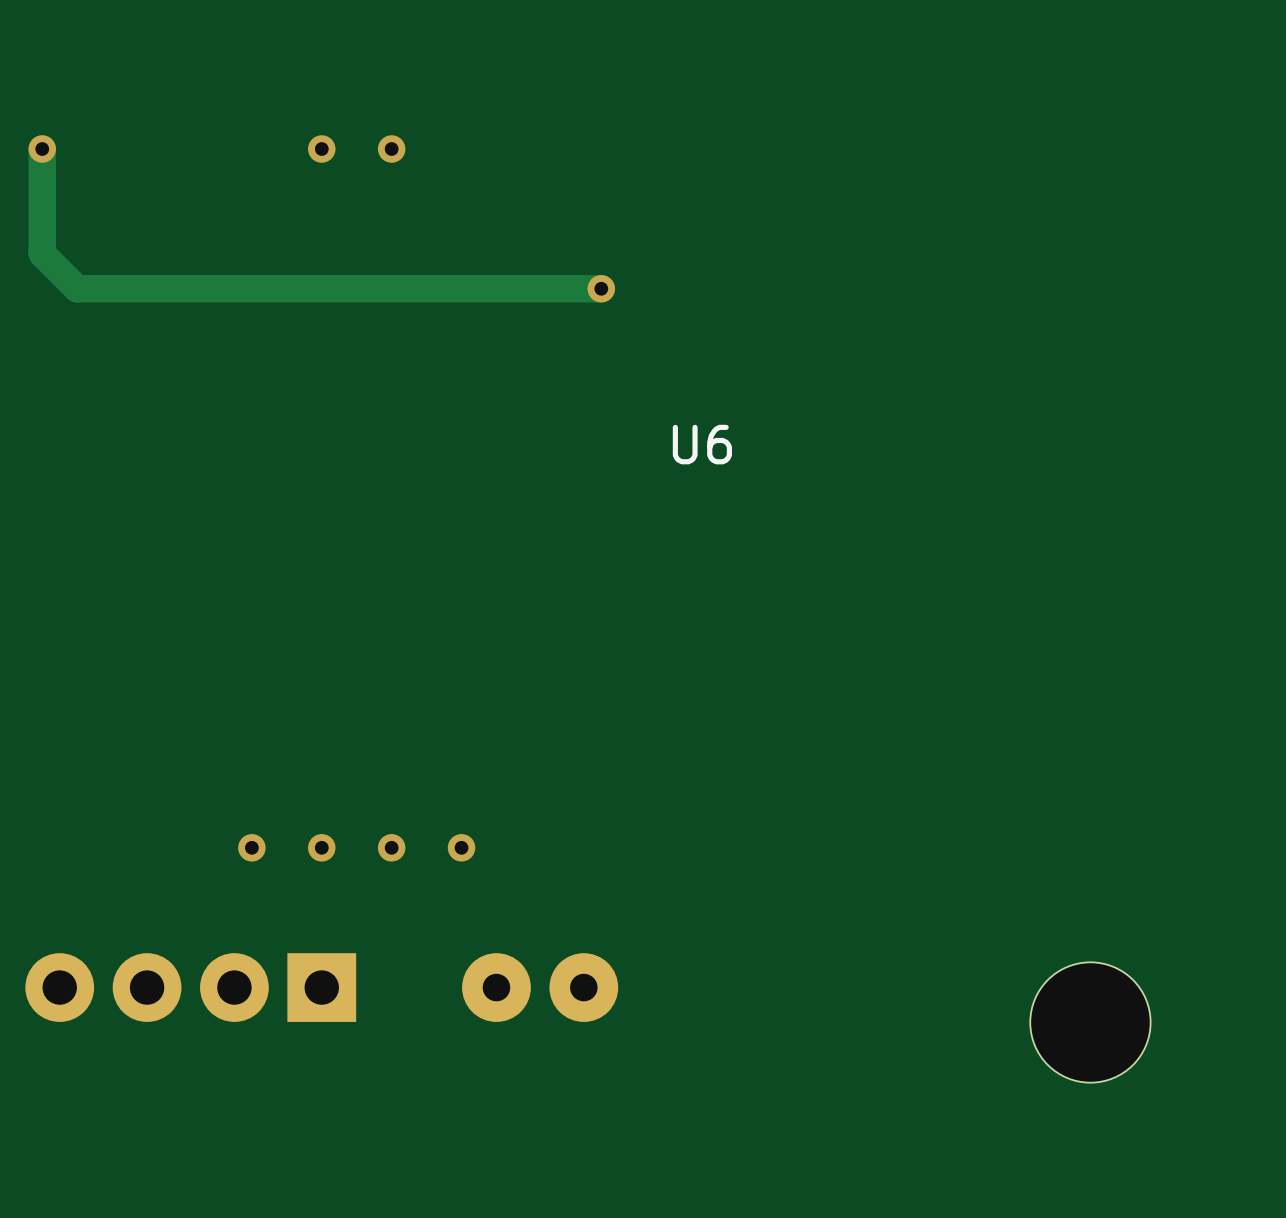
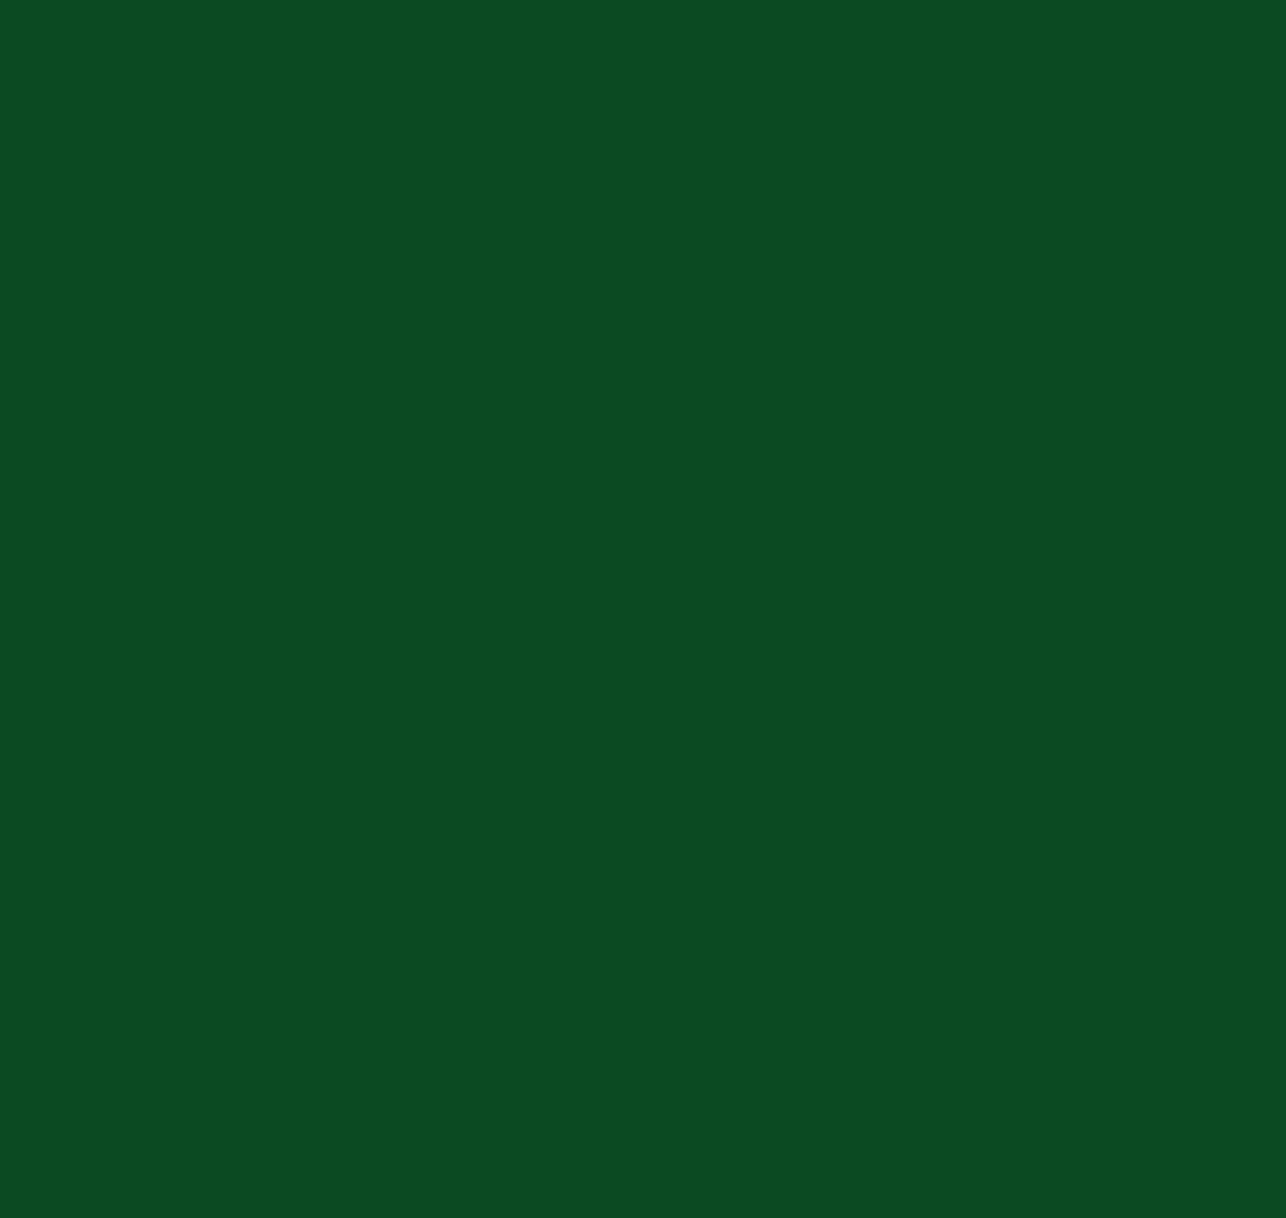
track: (42, 149) (42, 253) (77, 288) (601, 288) -> none
via: (42, 149) -> none
via: (321, 149) -> none
via: (391, 149) -> none
via: (601, 288) -> none
U6: (702, 444) -> none
via: (251, 847) -> none
via: (321, 847) -> none
via: (391, 847) -> none
via: (461, 847) -> none
part: (190, 987) -> none
part: (540, 987) -> none
part: (1090, 1022) -> none

